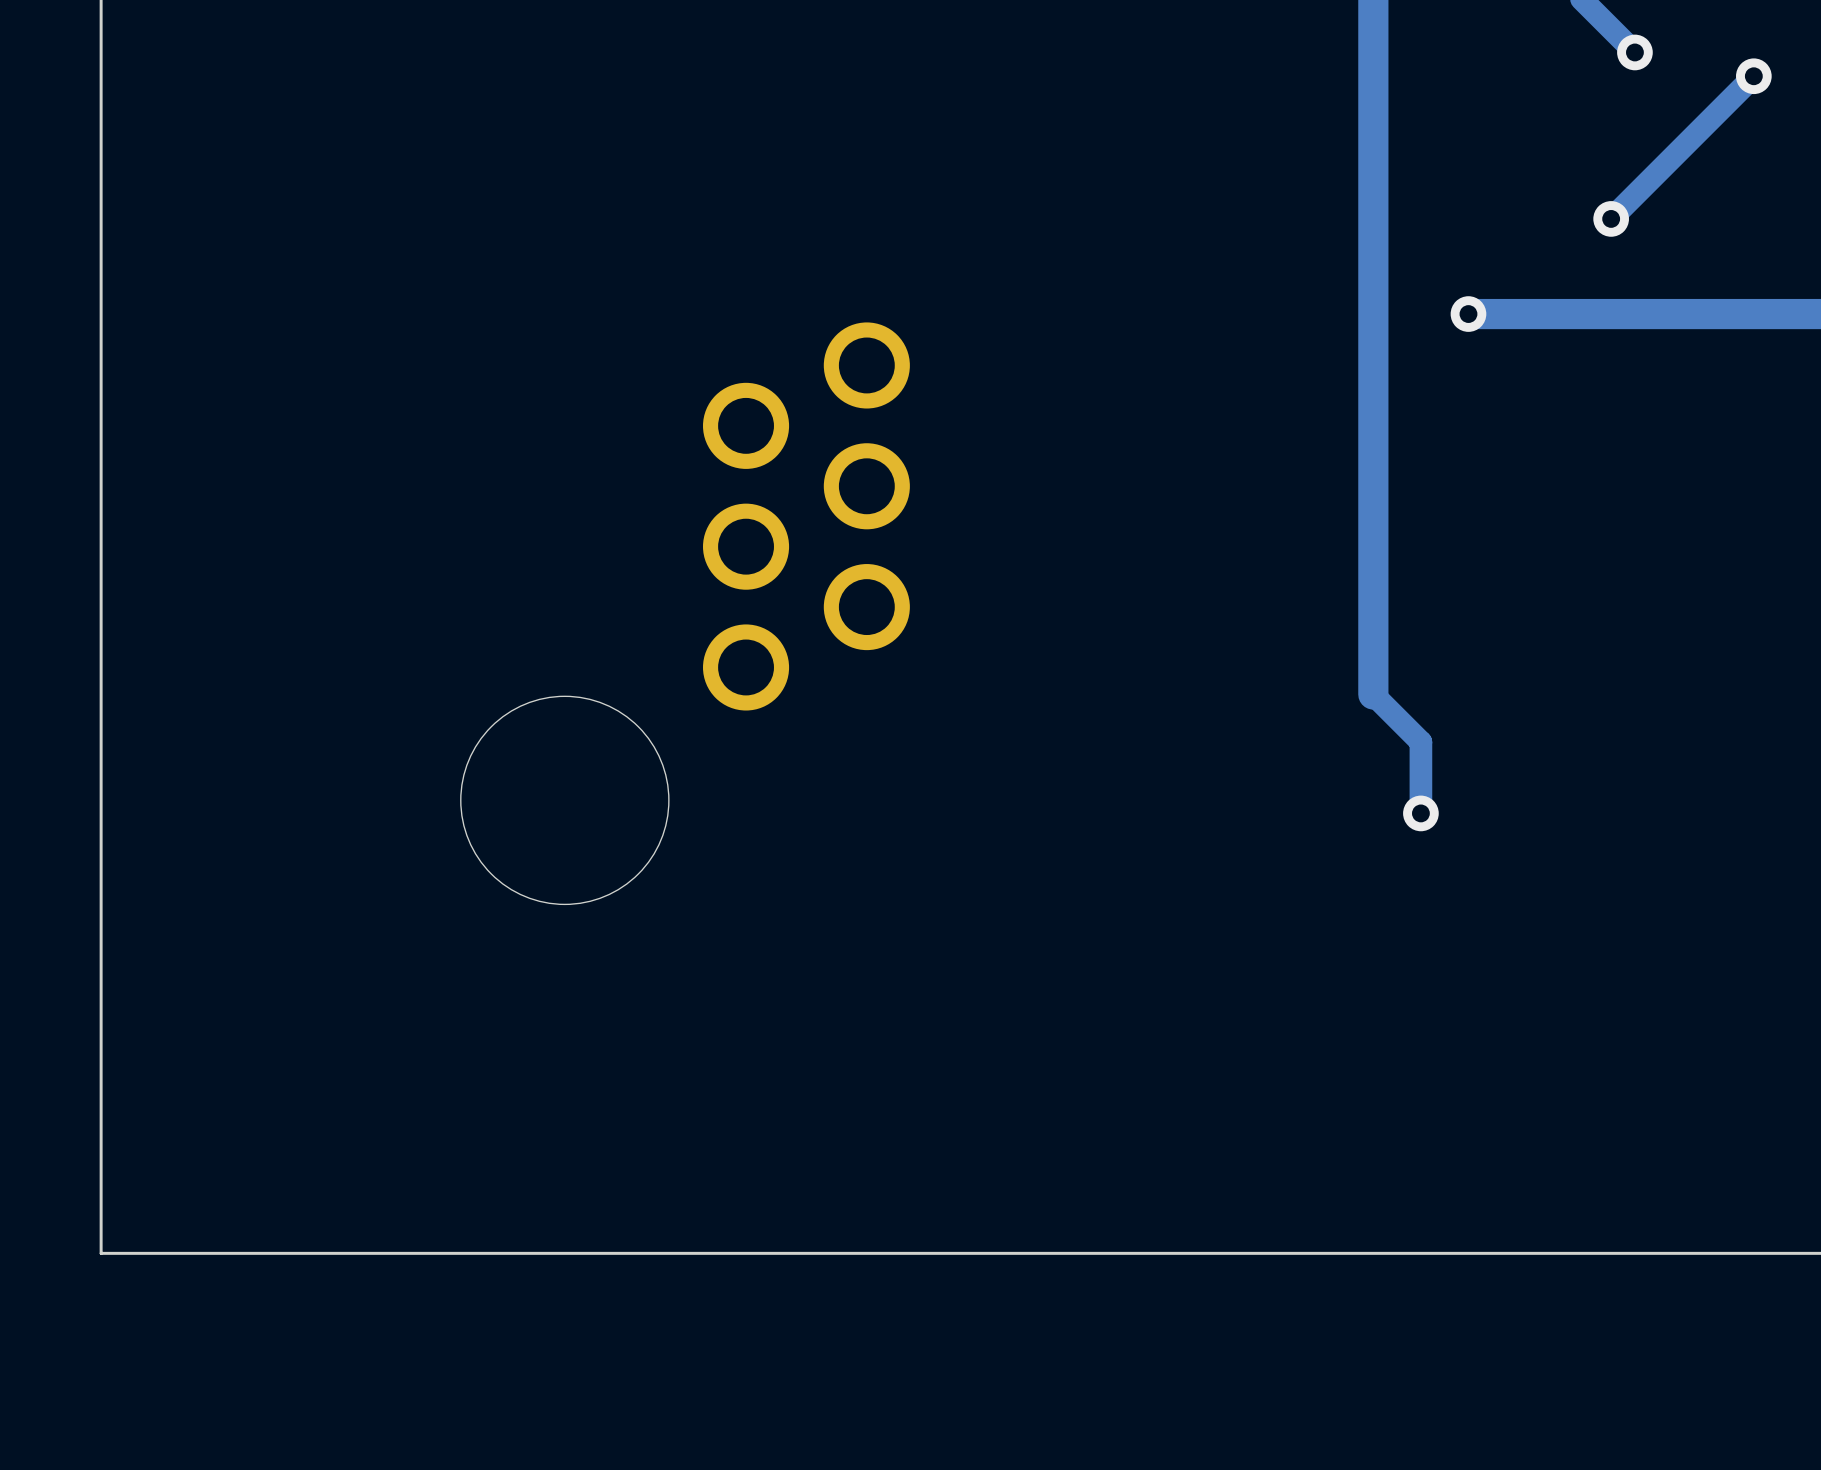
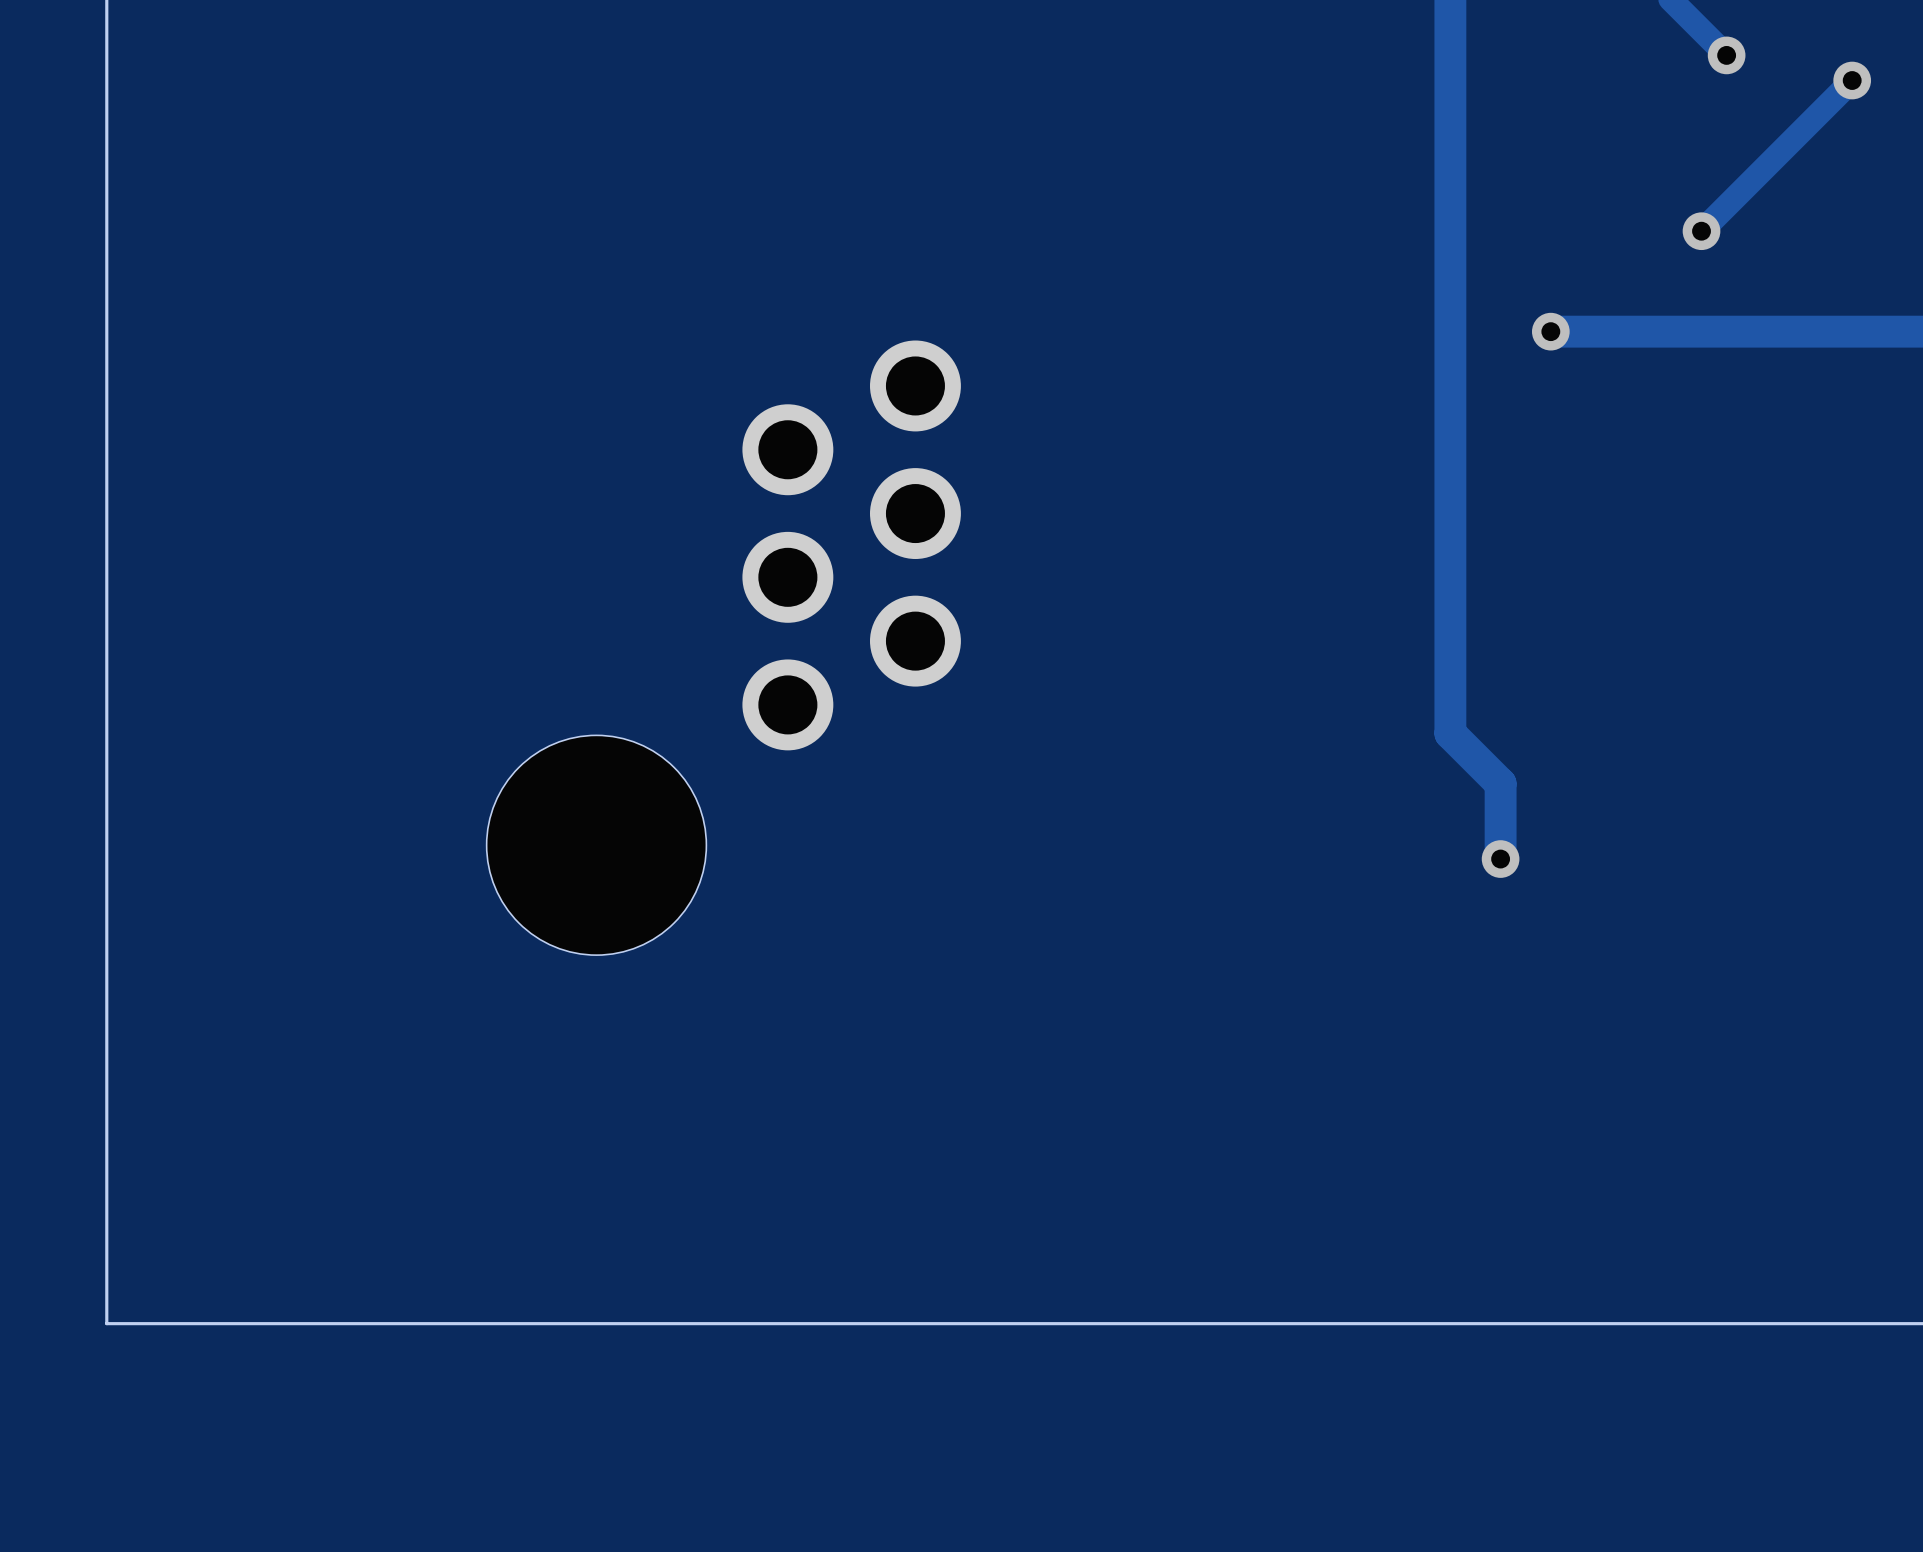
track width: thin (1373, 694) (1420, 742) (1420, 813) -> thick (1450, 733) (1500, 783) (1500, 859)

